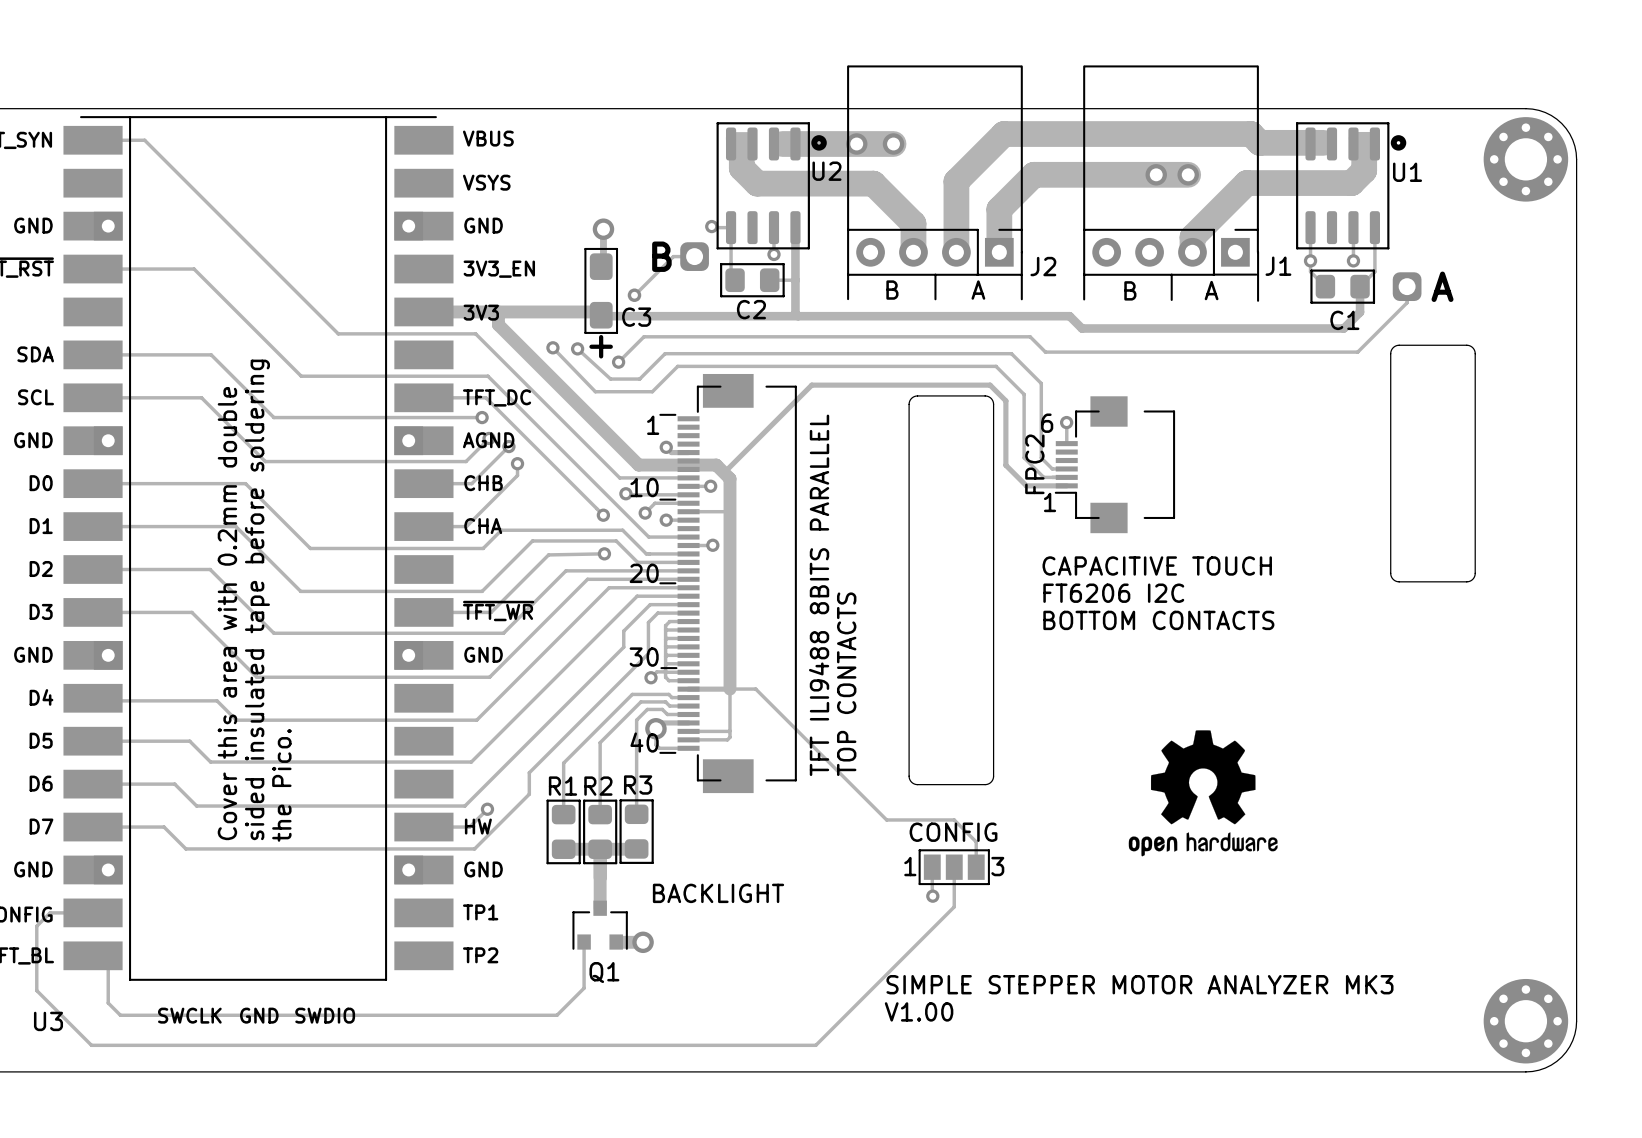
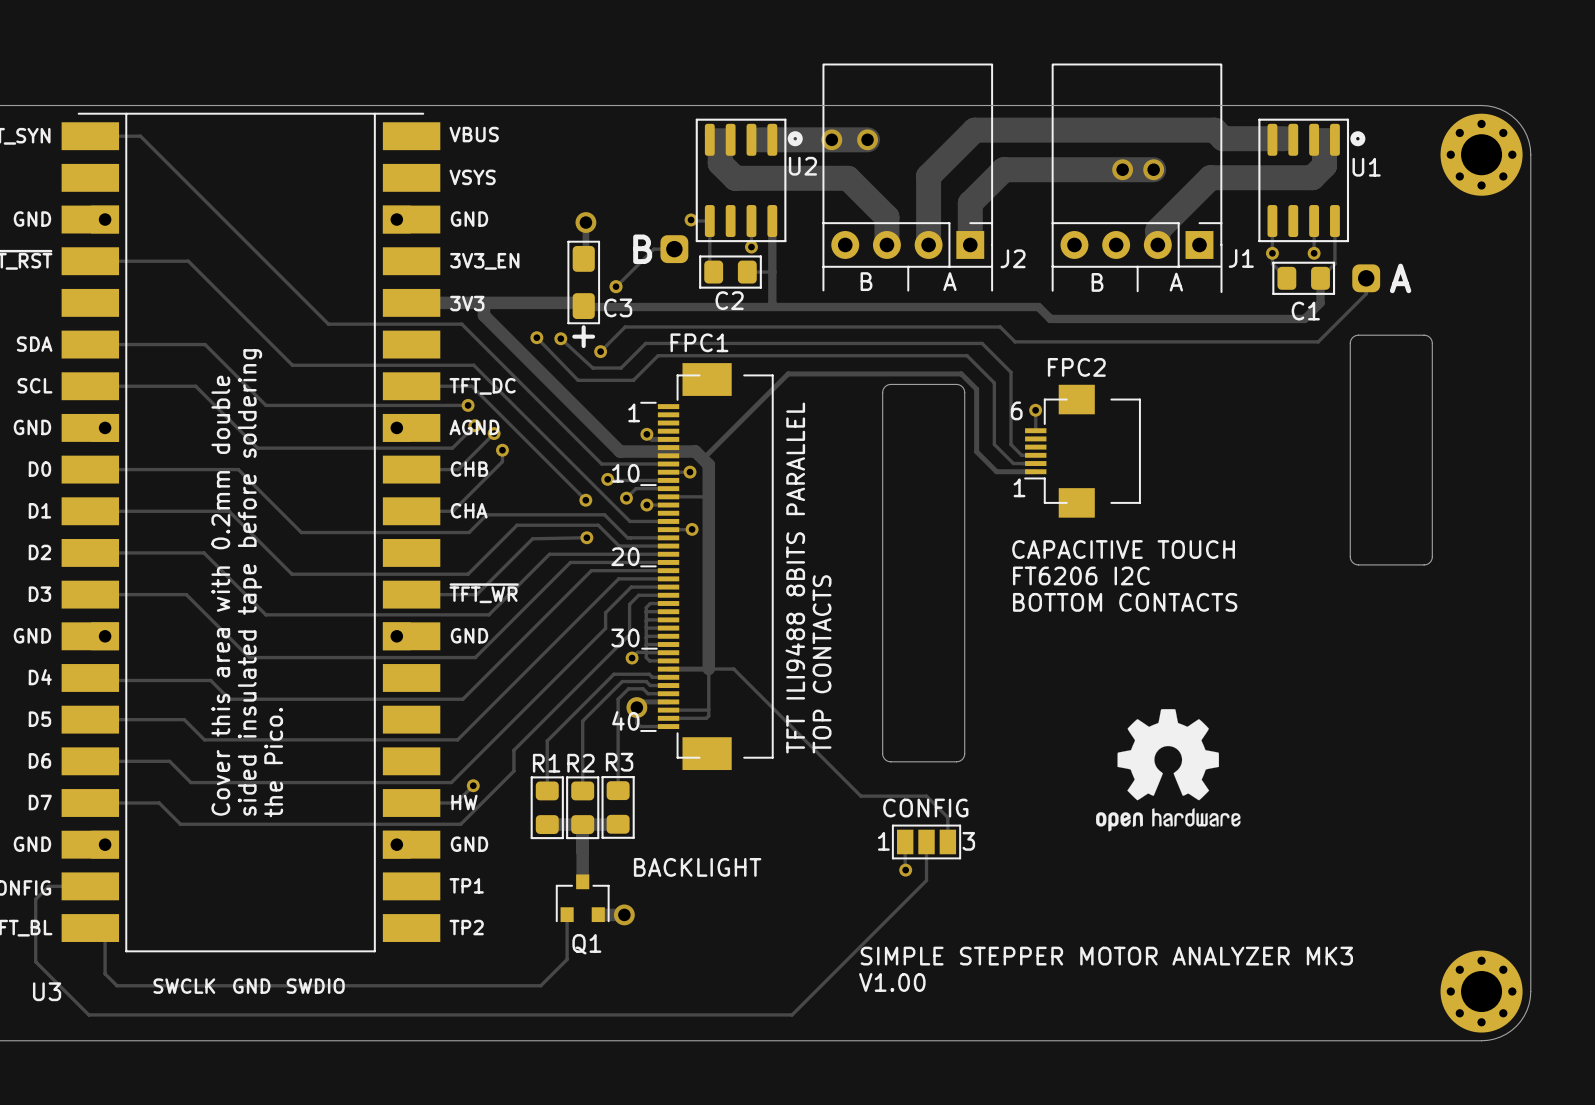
FPC1 name: none -> FPC1 (699, 342)
FPC2 name rotation: 0° (1034, 464) -> 90° clockwise (1076, 367)
FPC2 name position: FPC2 (1034, 464) -> FPC2 (1076, 367)

